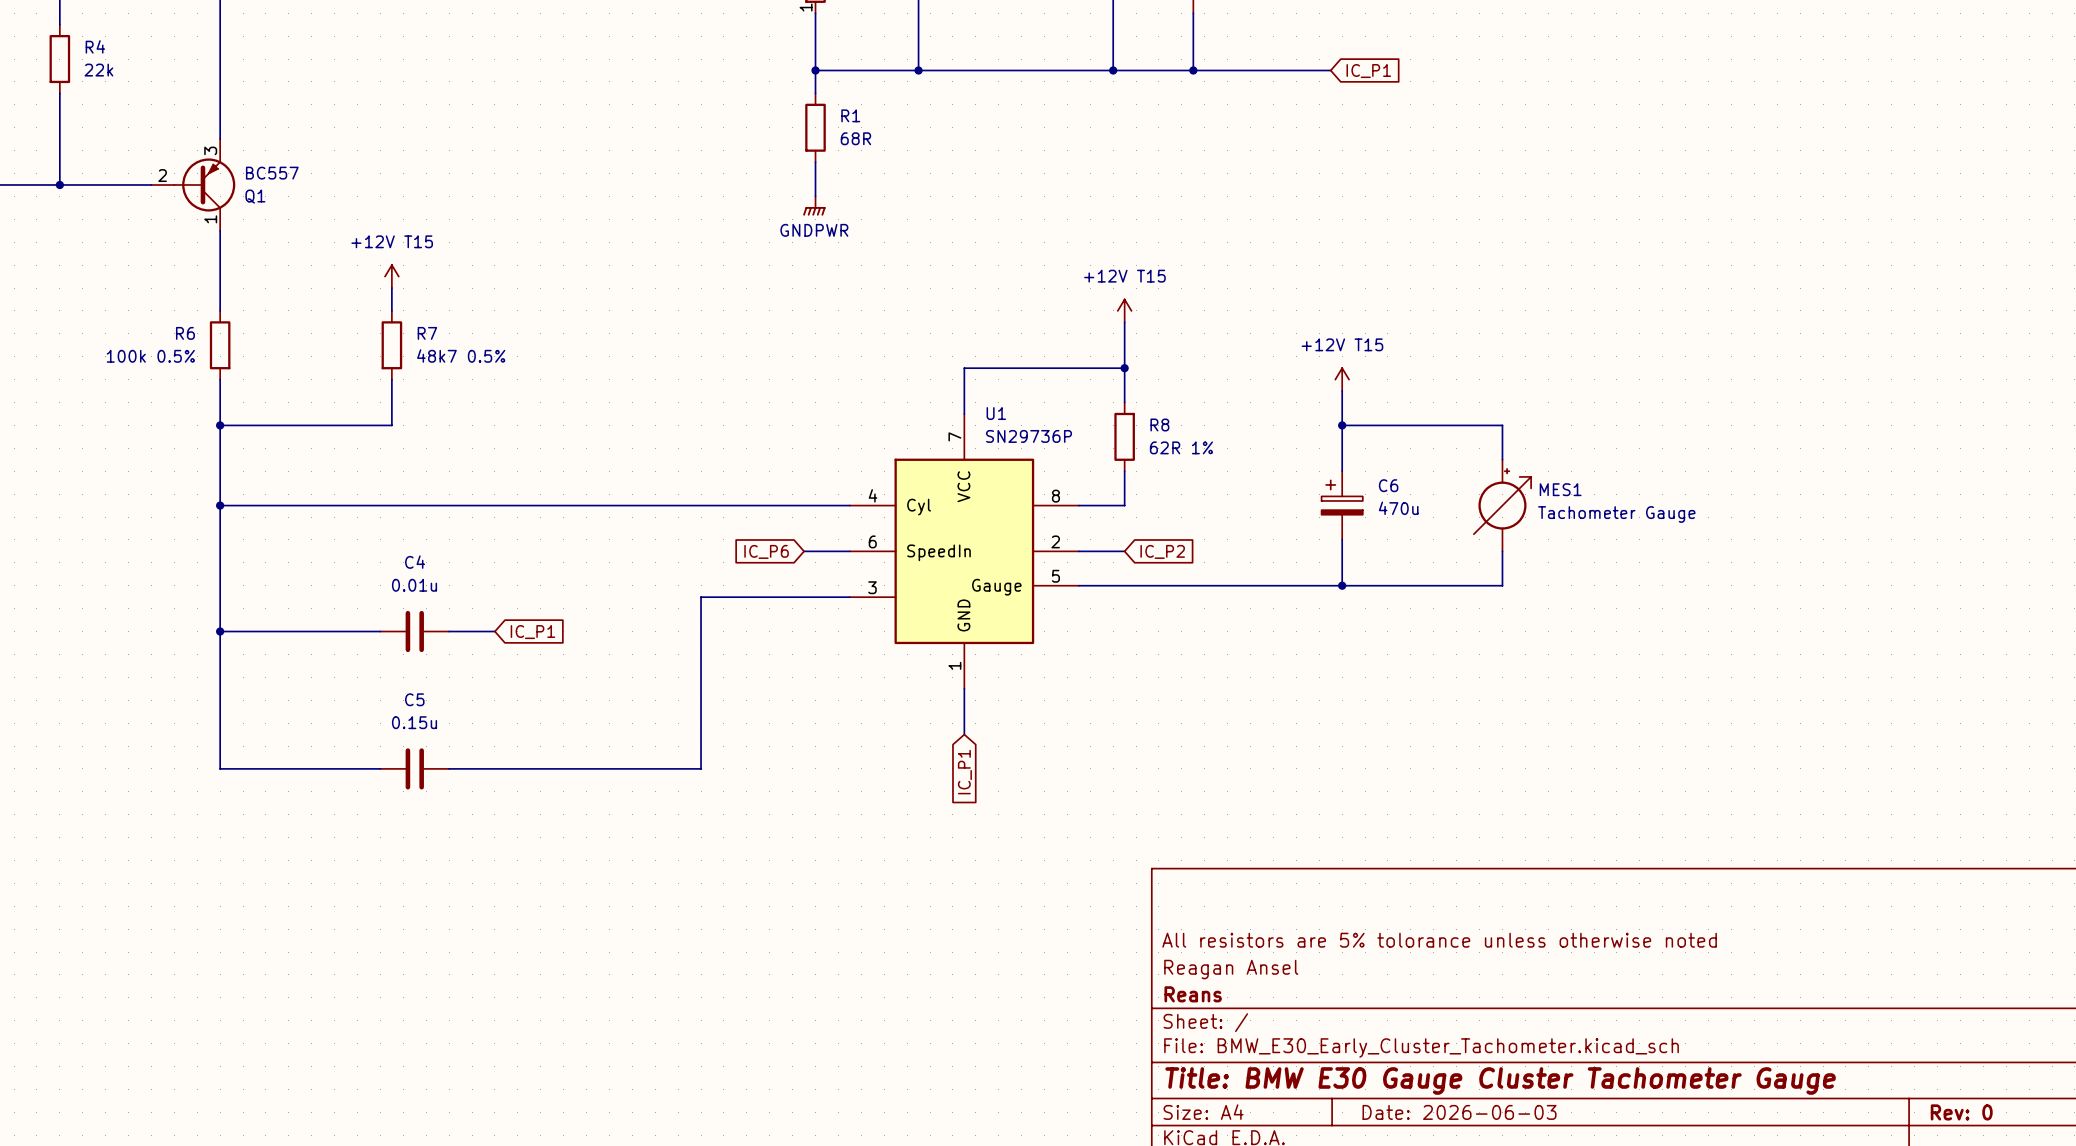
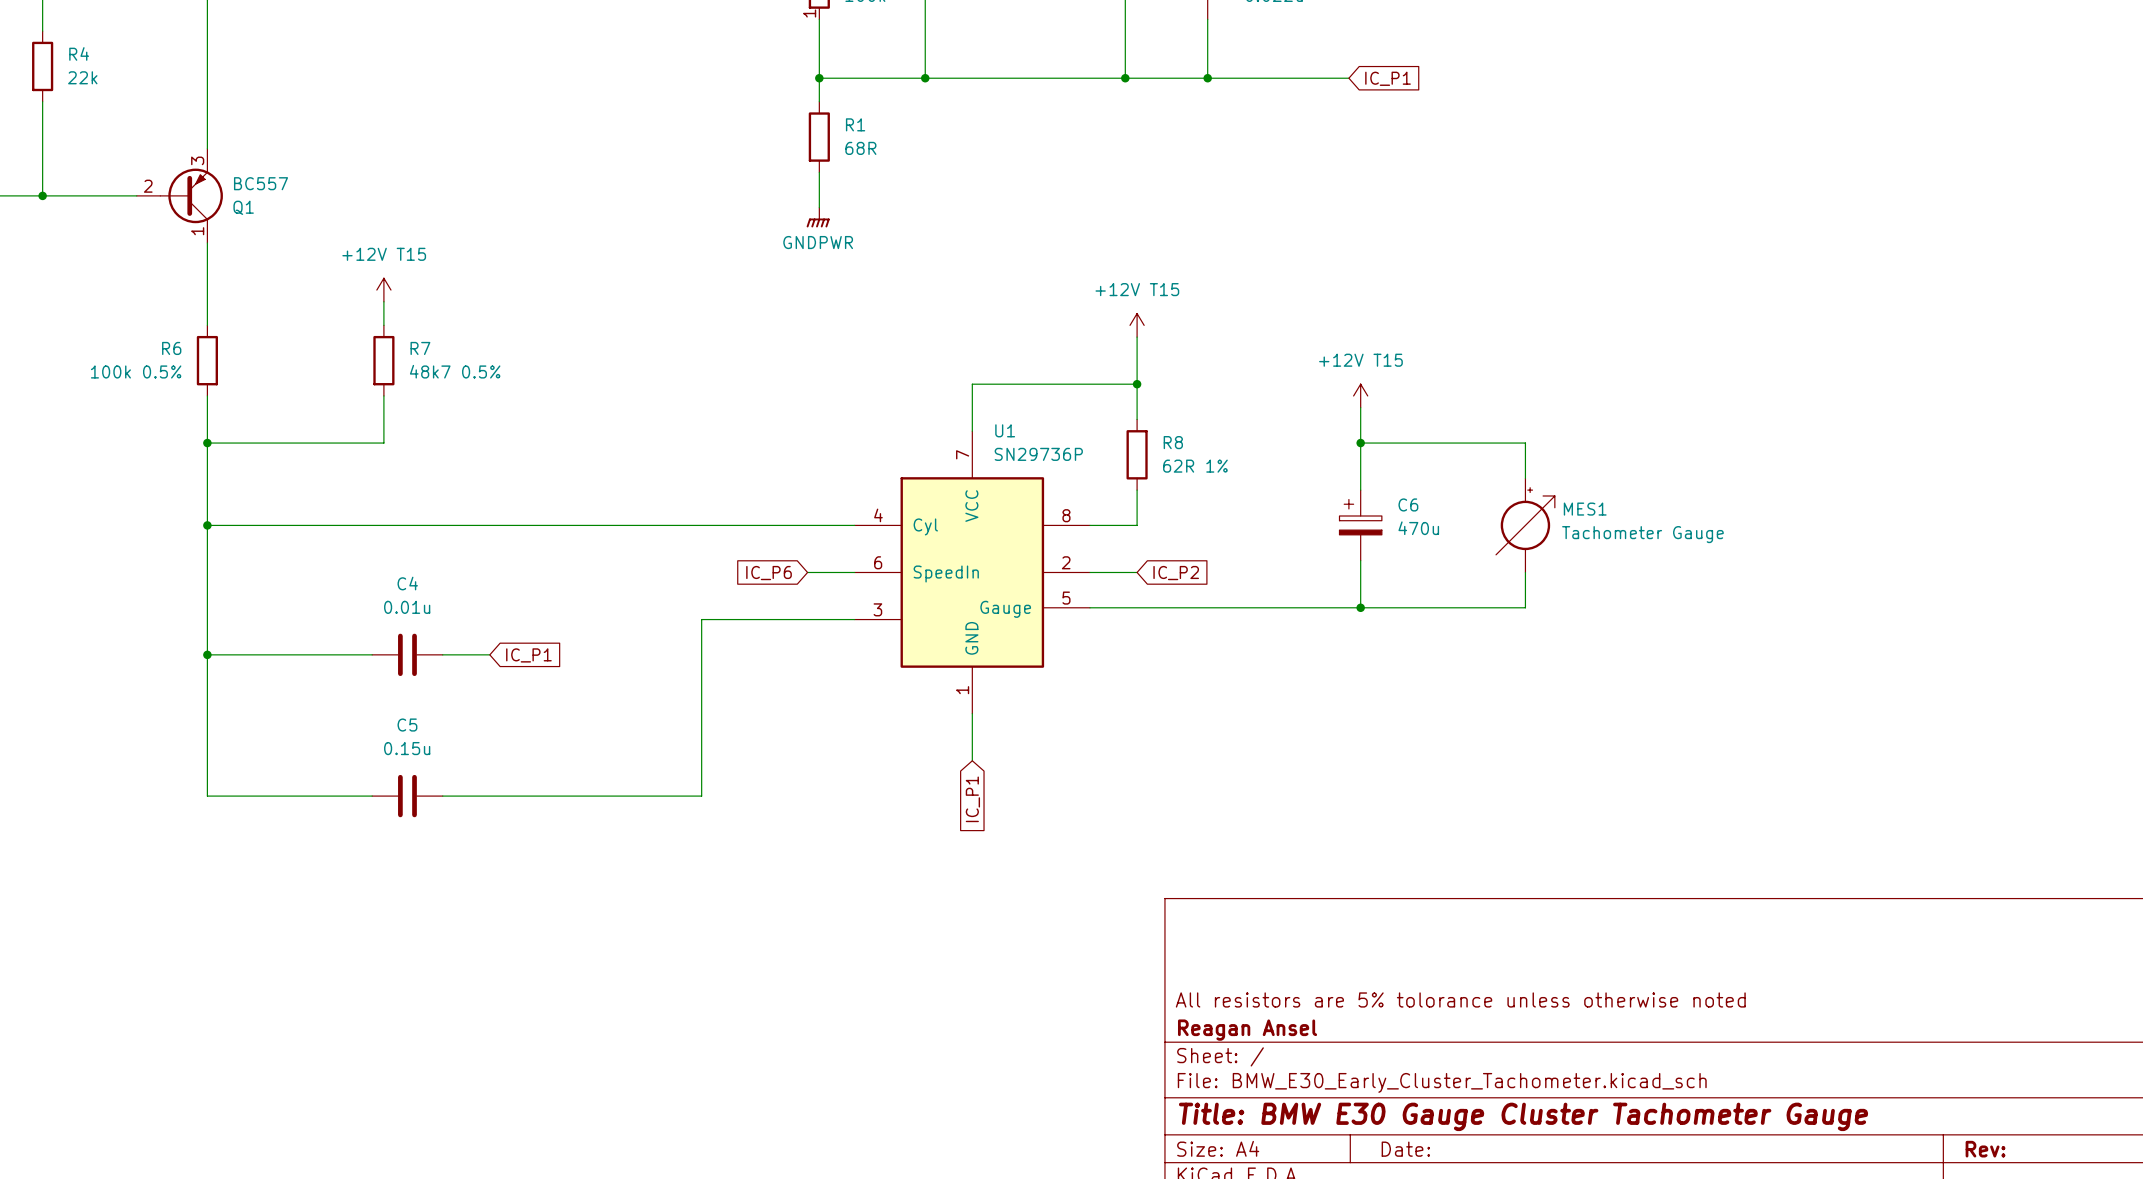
title block: All resistors are 5% tolorance unless otherwise noted (1439, 940) -> none
title block: Reagan Ansel (1231, 969) -> All resistors are 5% tolorance unless otherwise noted (1460, 999)
title block: Reans (1193, 994) -> Reagan Ansel (1247, 1030)
title block: Date: 2026-06-03 (1459, 1112) -> Date: (1405, 1149)
title block: Rev: 0 (1961, 1112) -> Rev: (1985, 1149)

